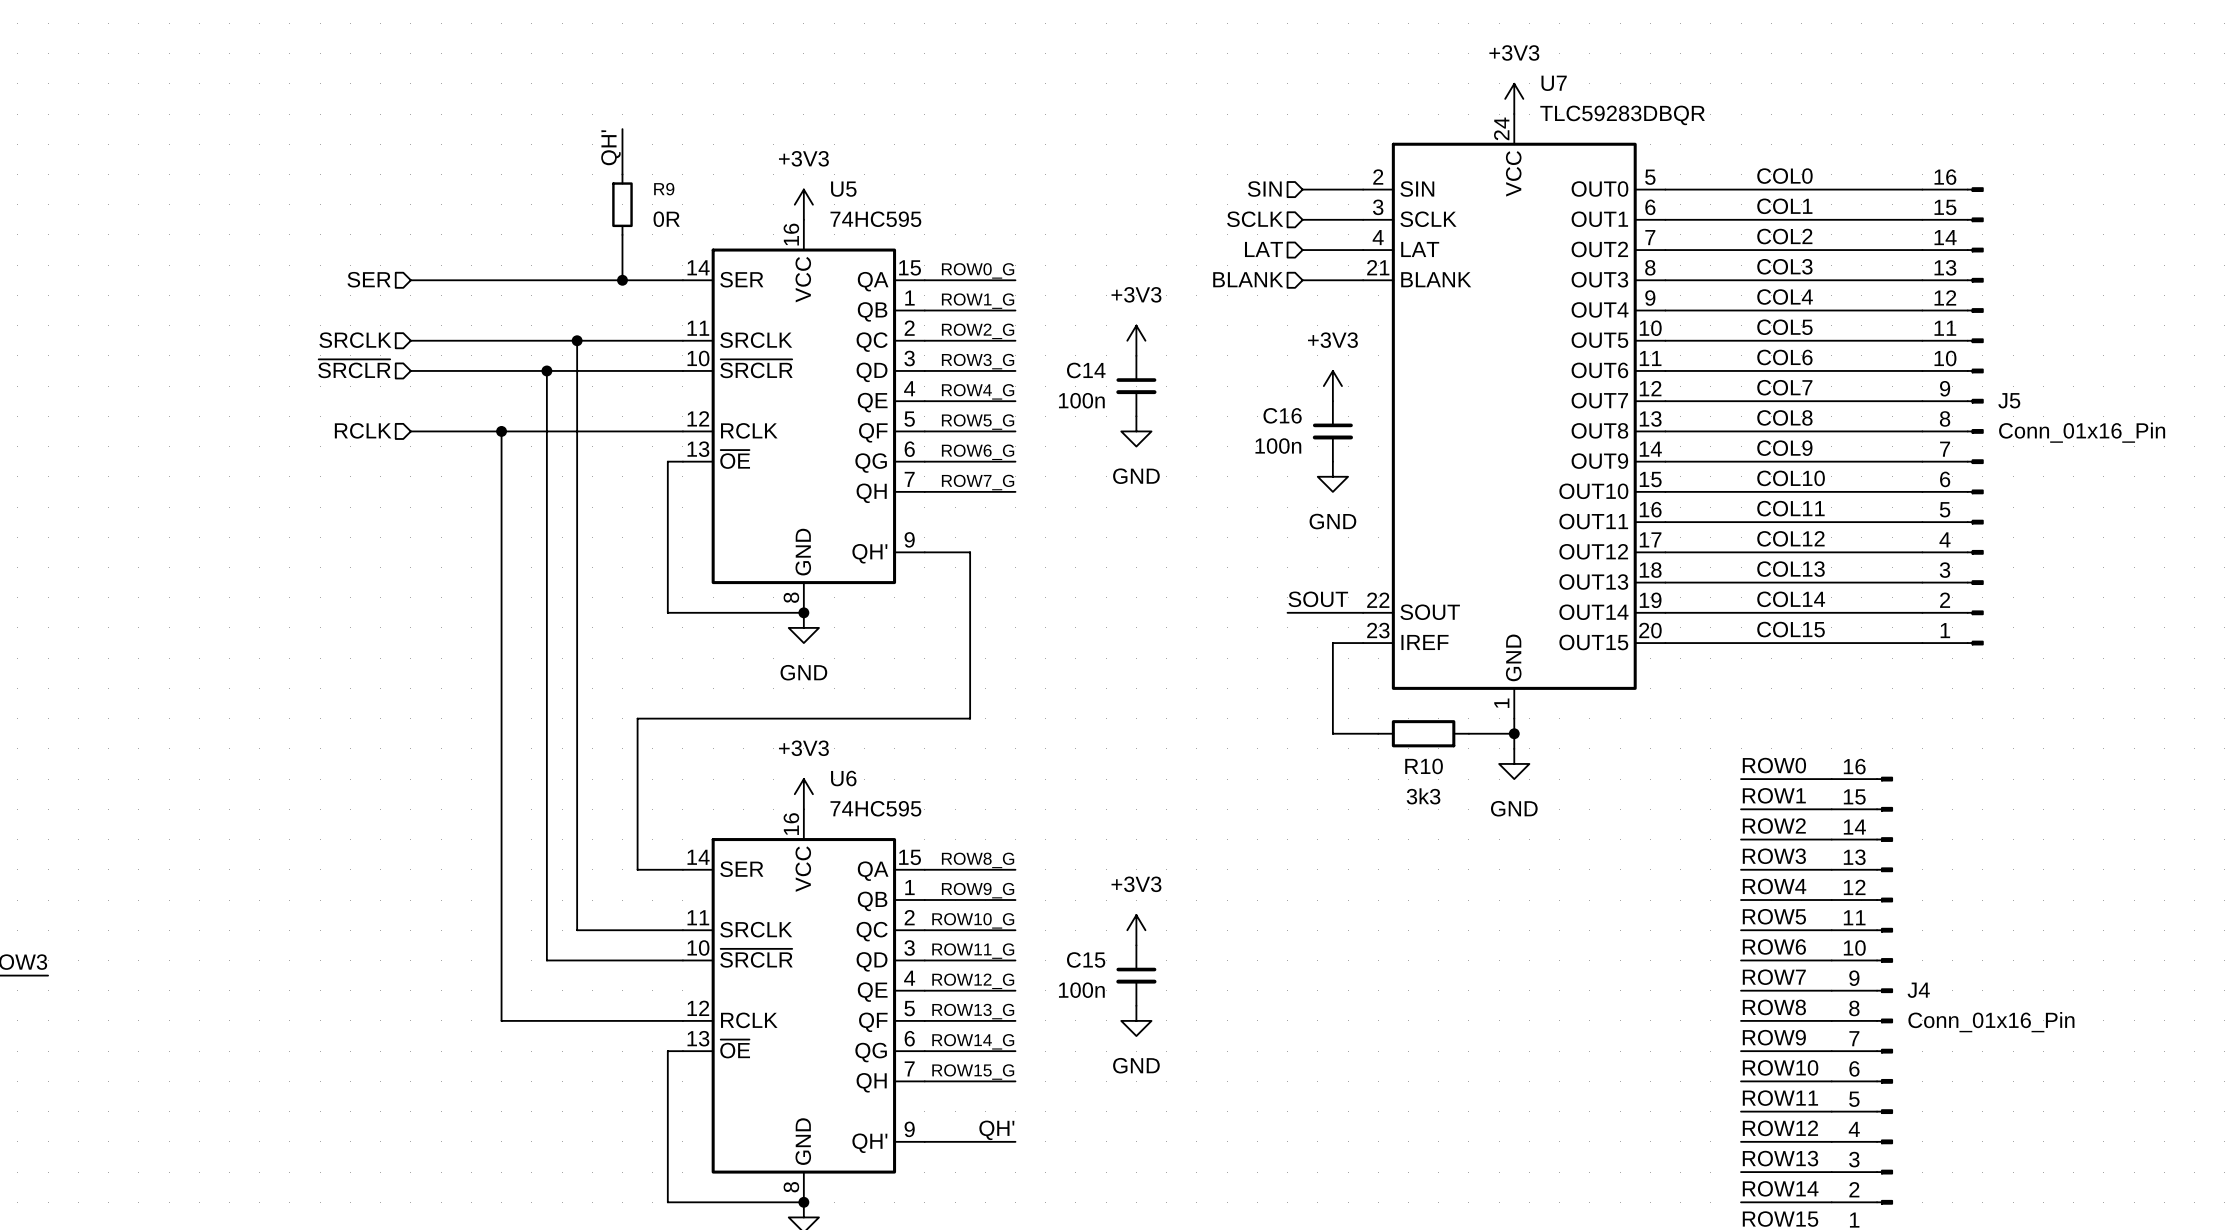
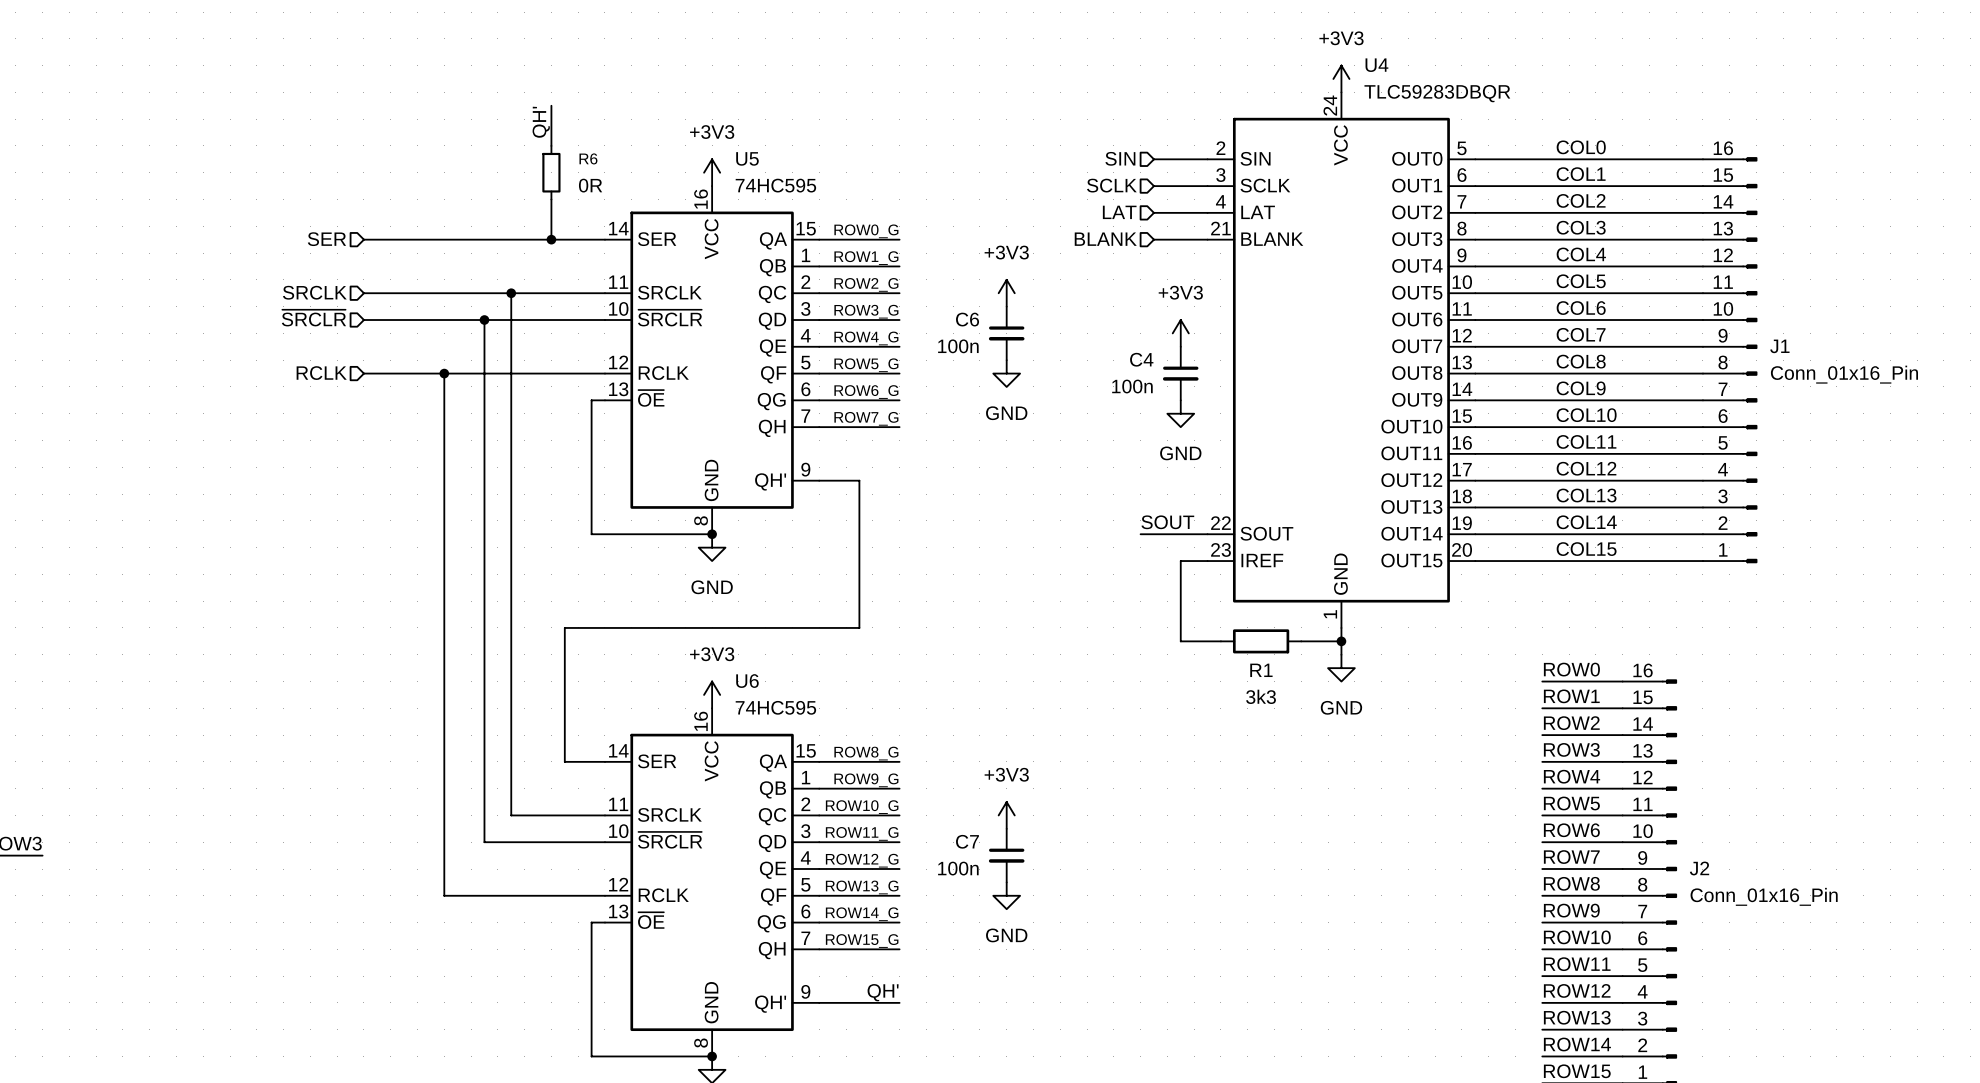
U7 name: U7 (1554, 83) -> U4 (1376, 65)
R9 name: R9 (664, 189) -> R6 (588, 158)
C14 name: C14 (1086, 370) -> C6 (967, 319)
J5 name: J5 (2009, 400) -> J1 (1779, 346)
C16 name: C16 (1282, 415) -> C4 (1141, 359)
R10 name: R10 (1424, 766) -> R1 (1261, 670)
C15 name: C15 (1086, 959) -> C7 (967, 841)
J4 name: J4 (1918, 990) -> J2 (1699, 868)

